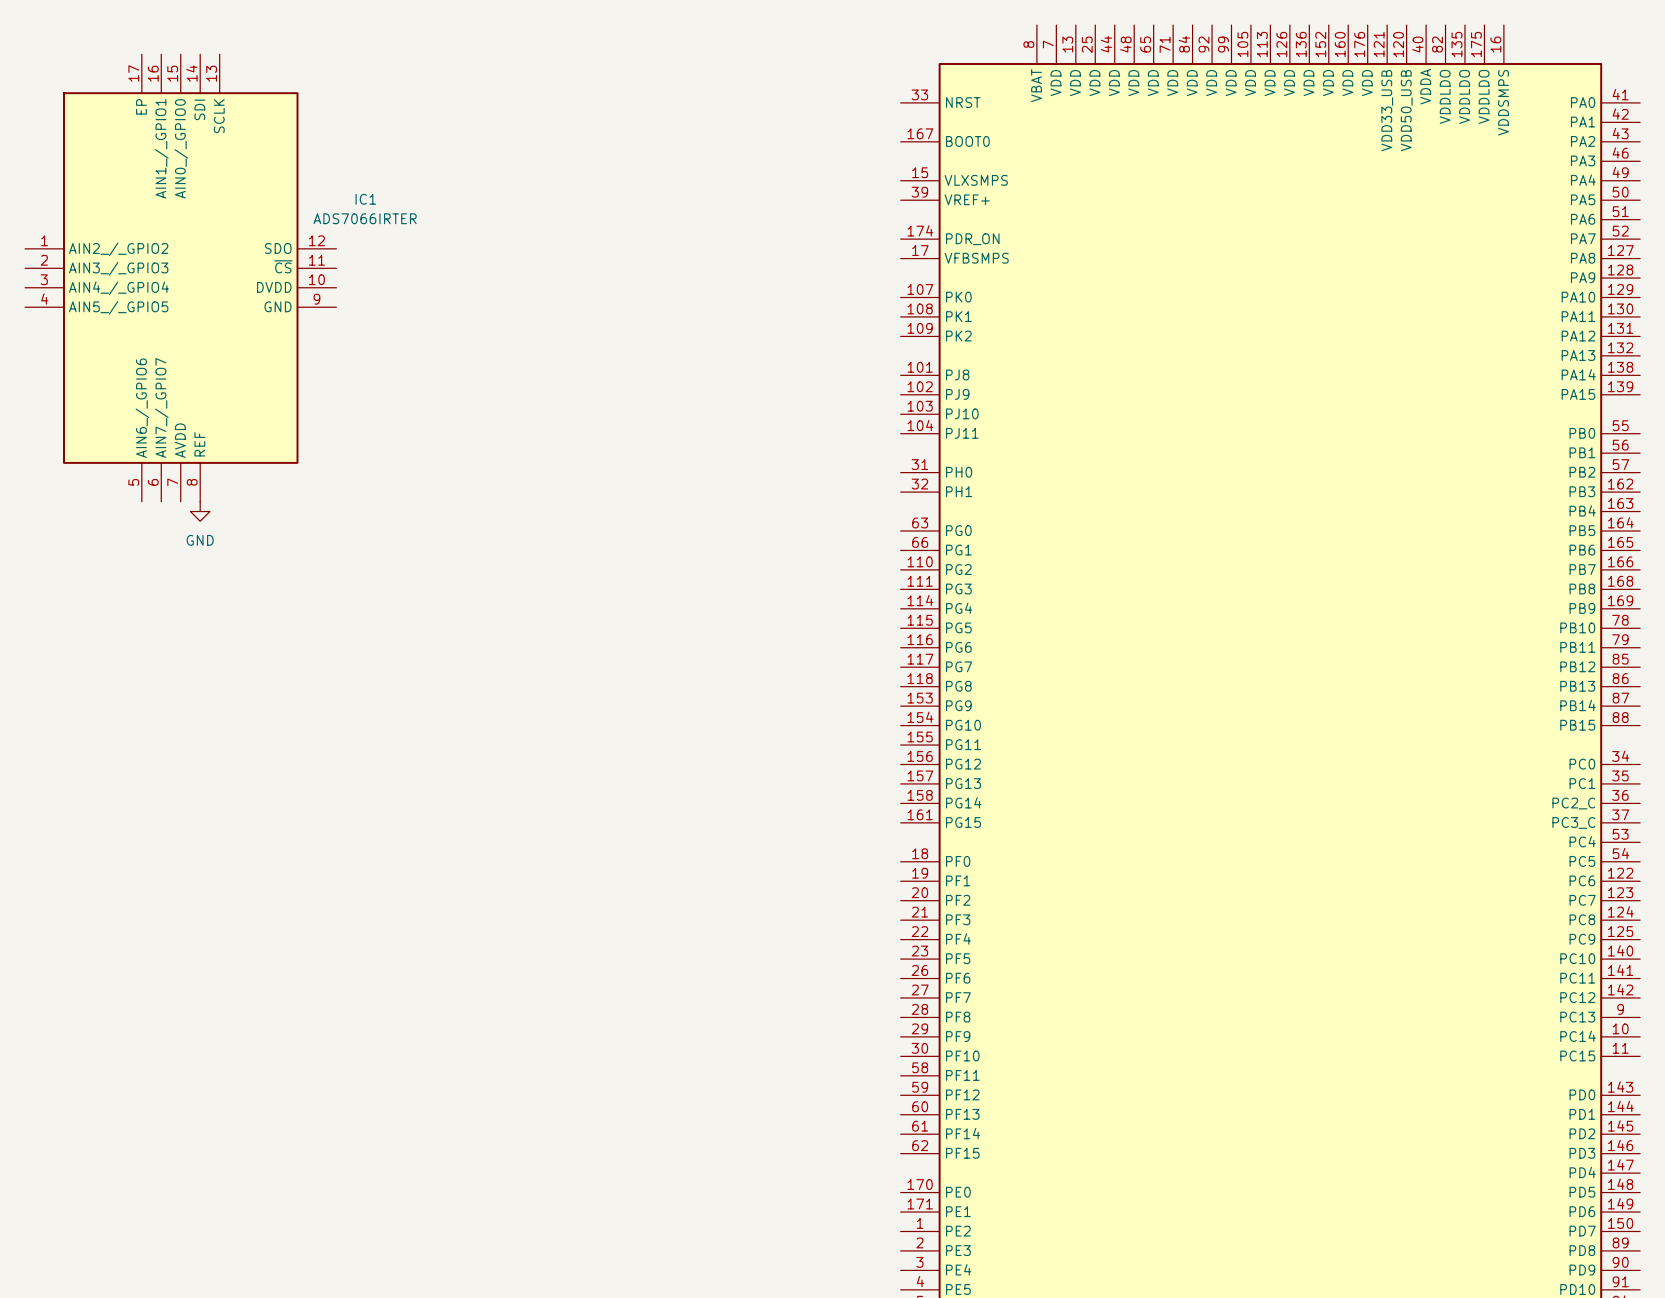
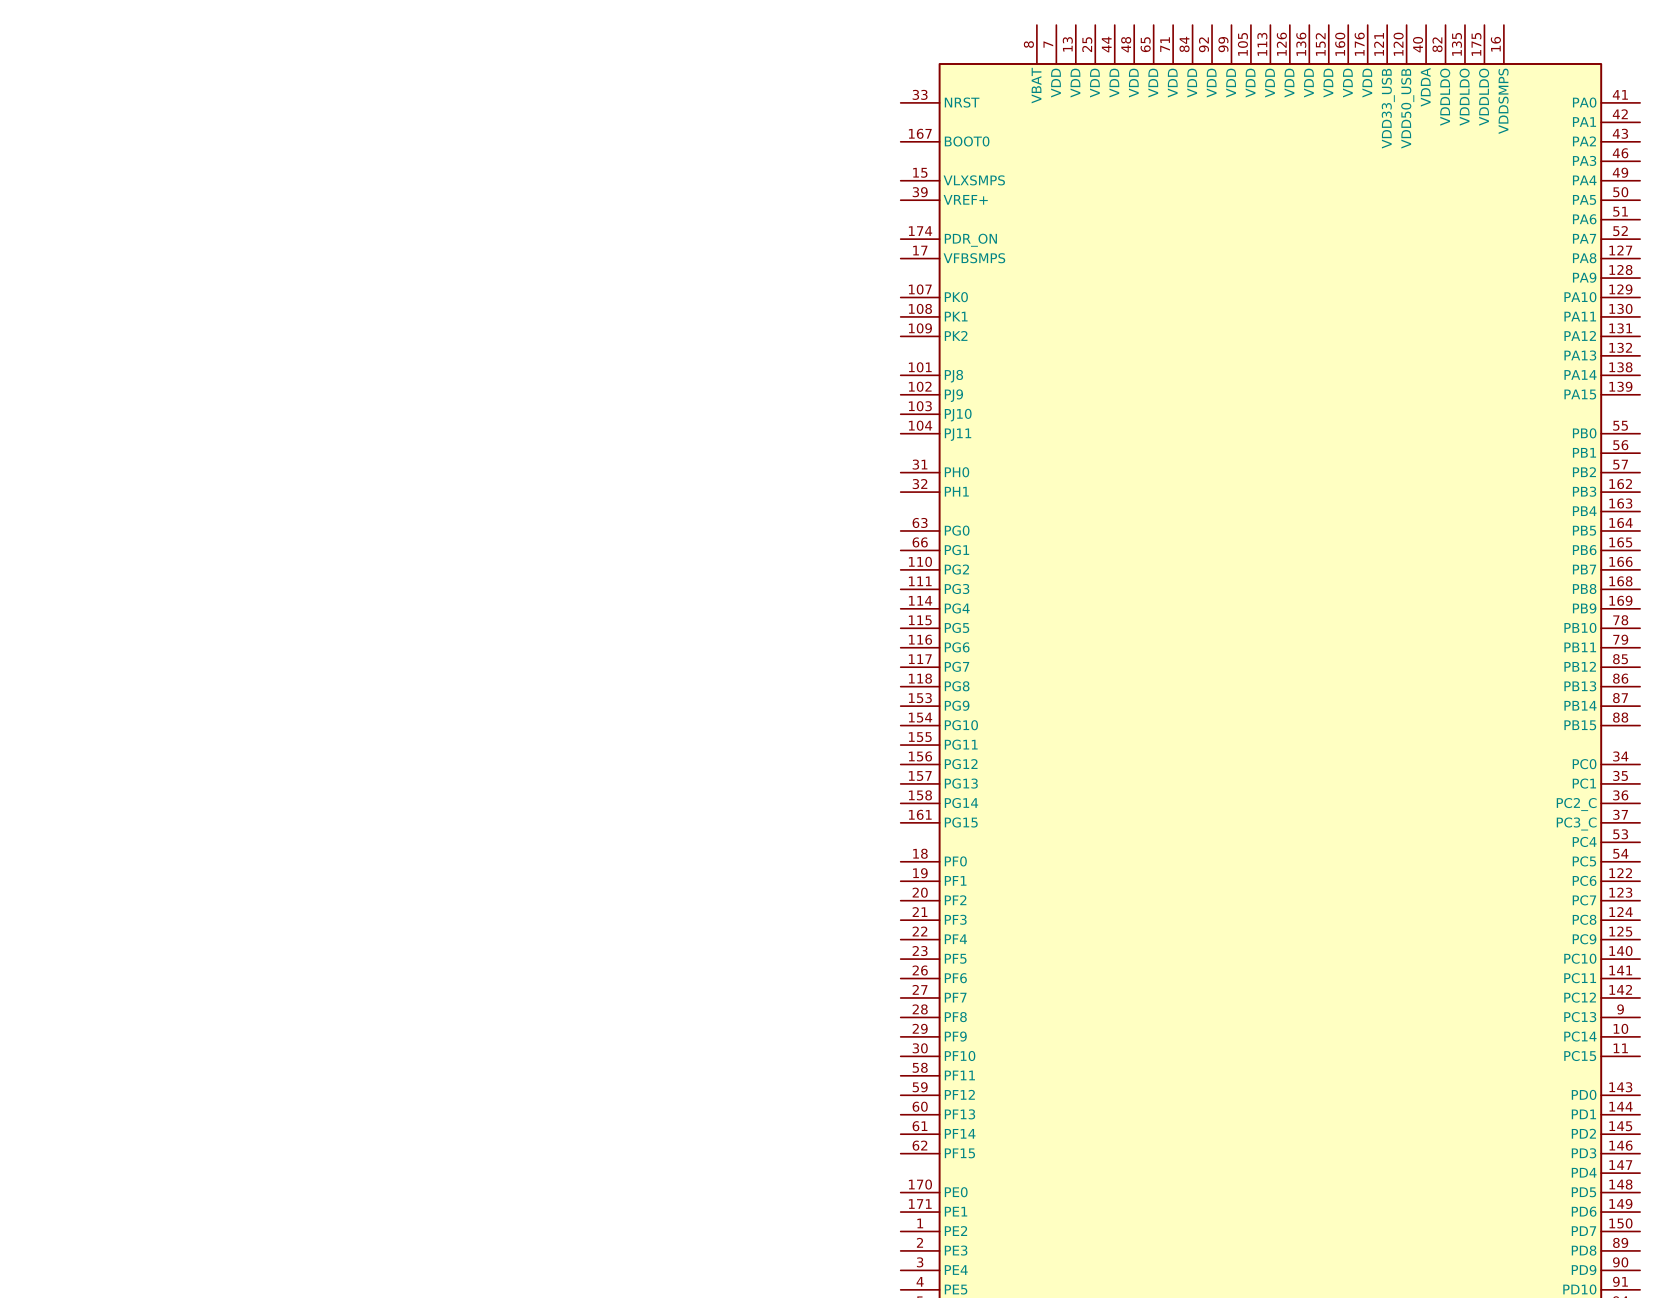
IC1: ADS7066IRTER (180, 278) -> none
power symbol: GND (200, 511) -> none

